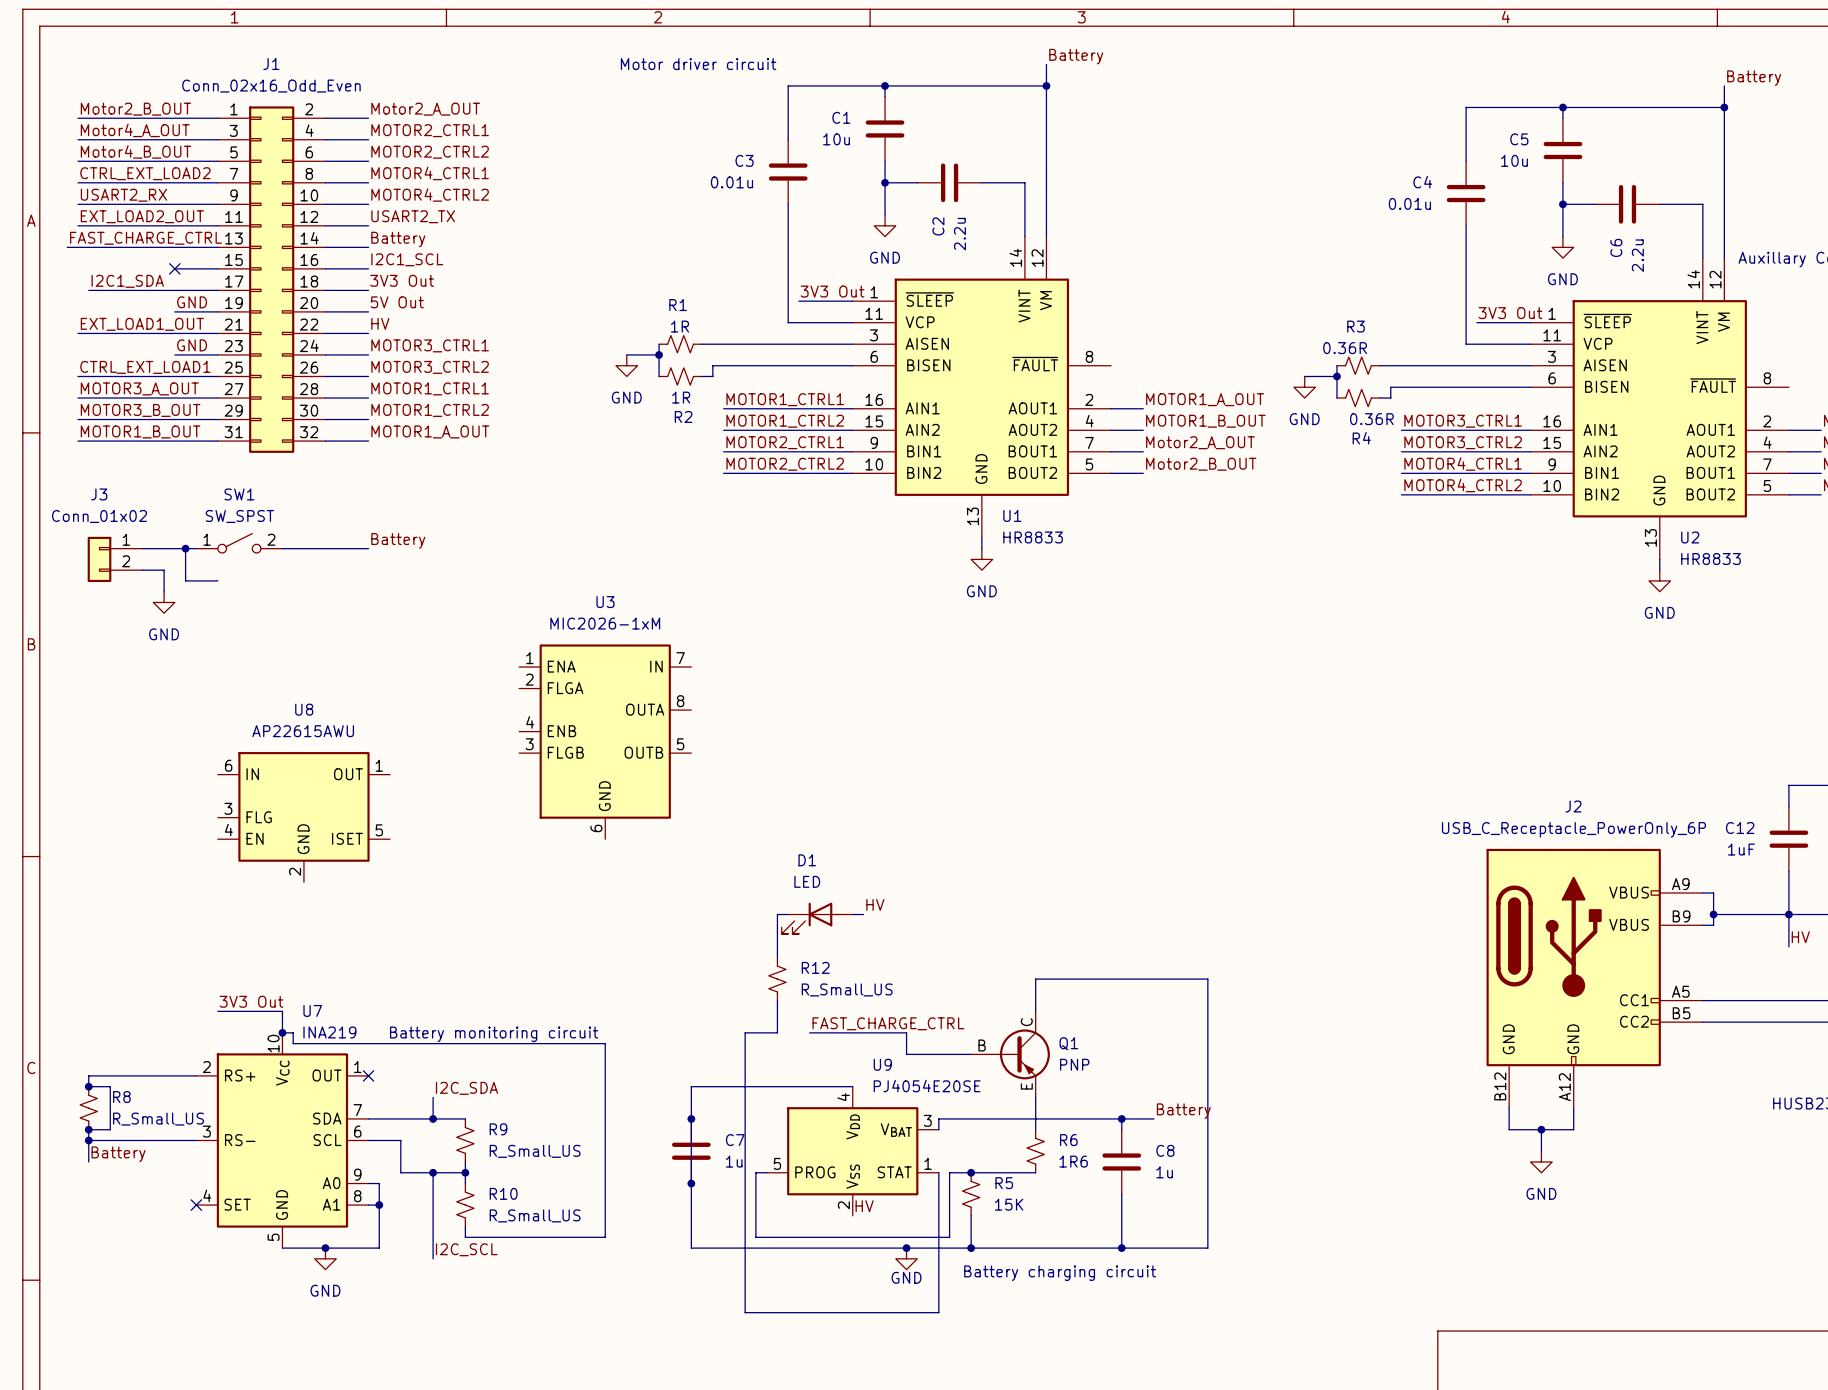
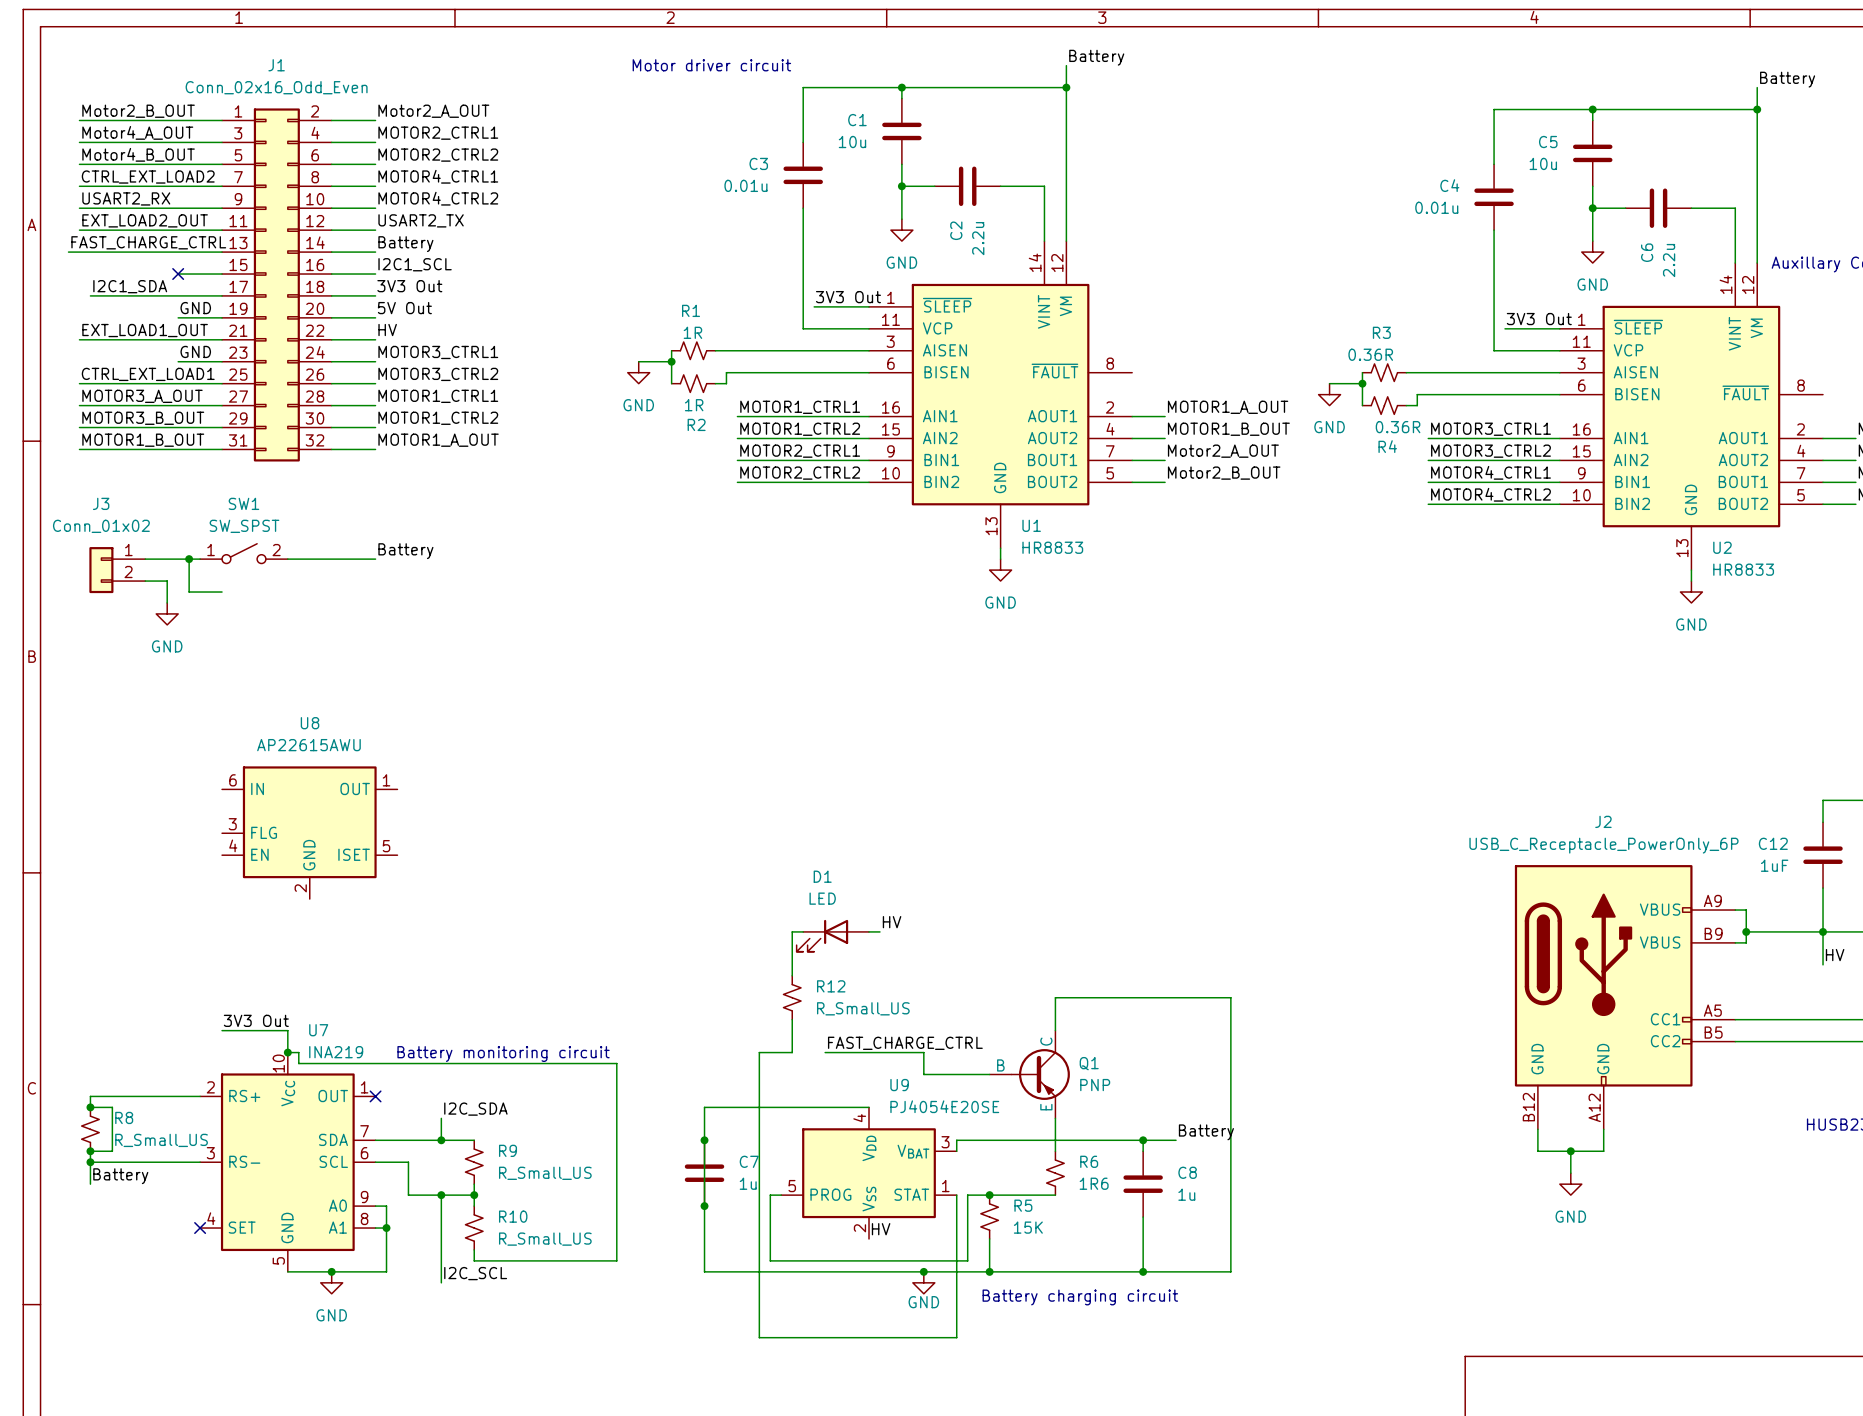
U3: MIC2026-1xM (605, 741) -> none

